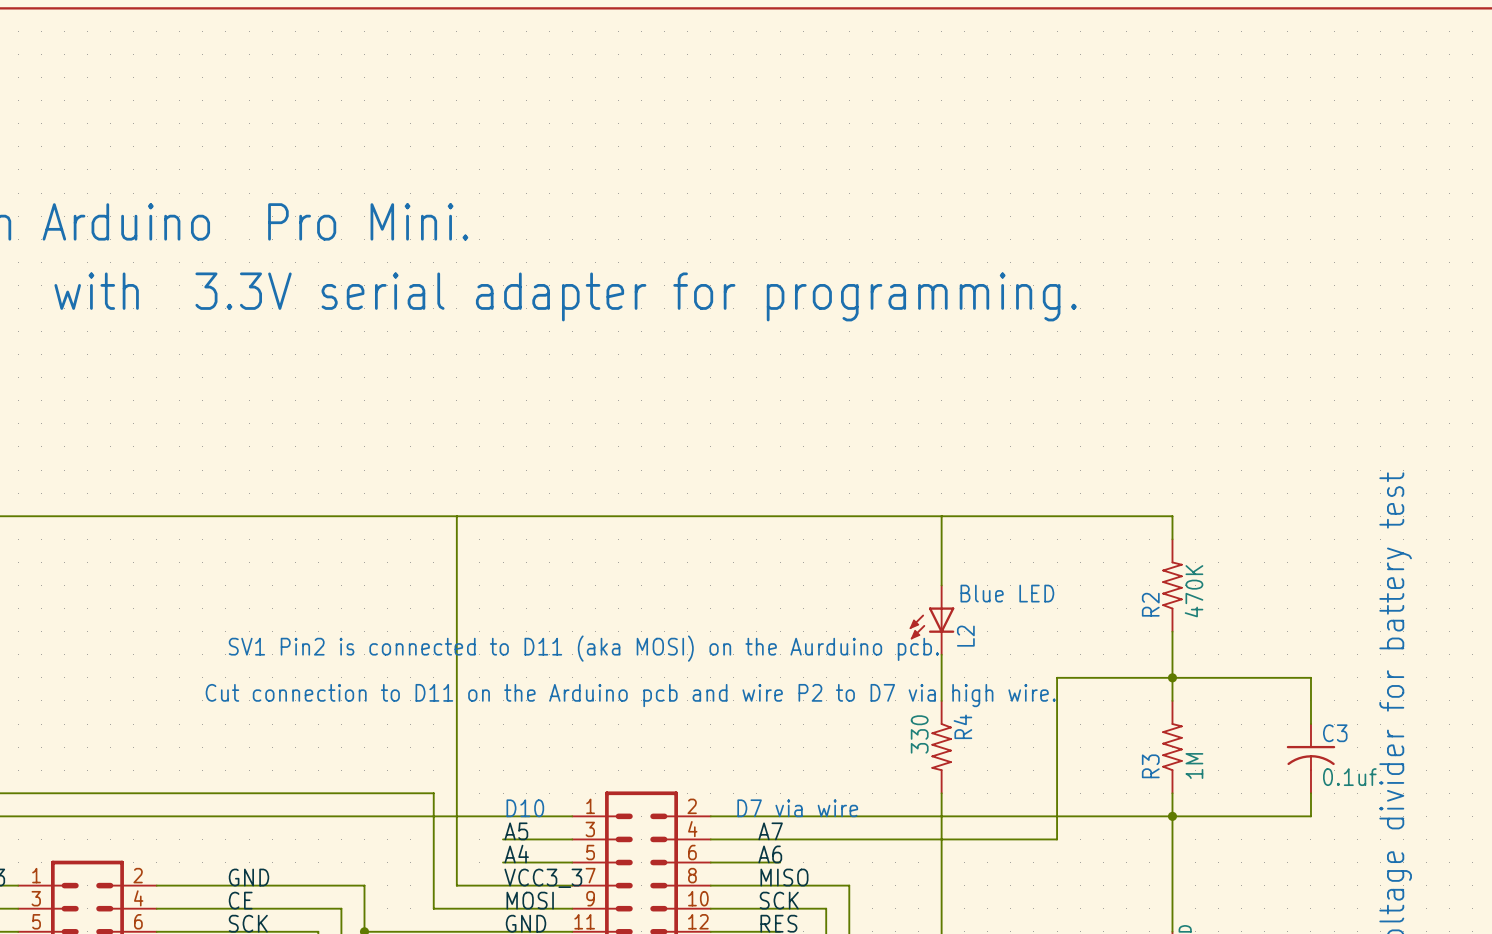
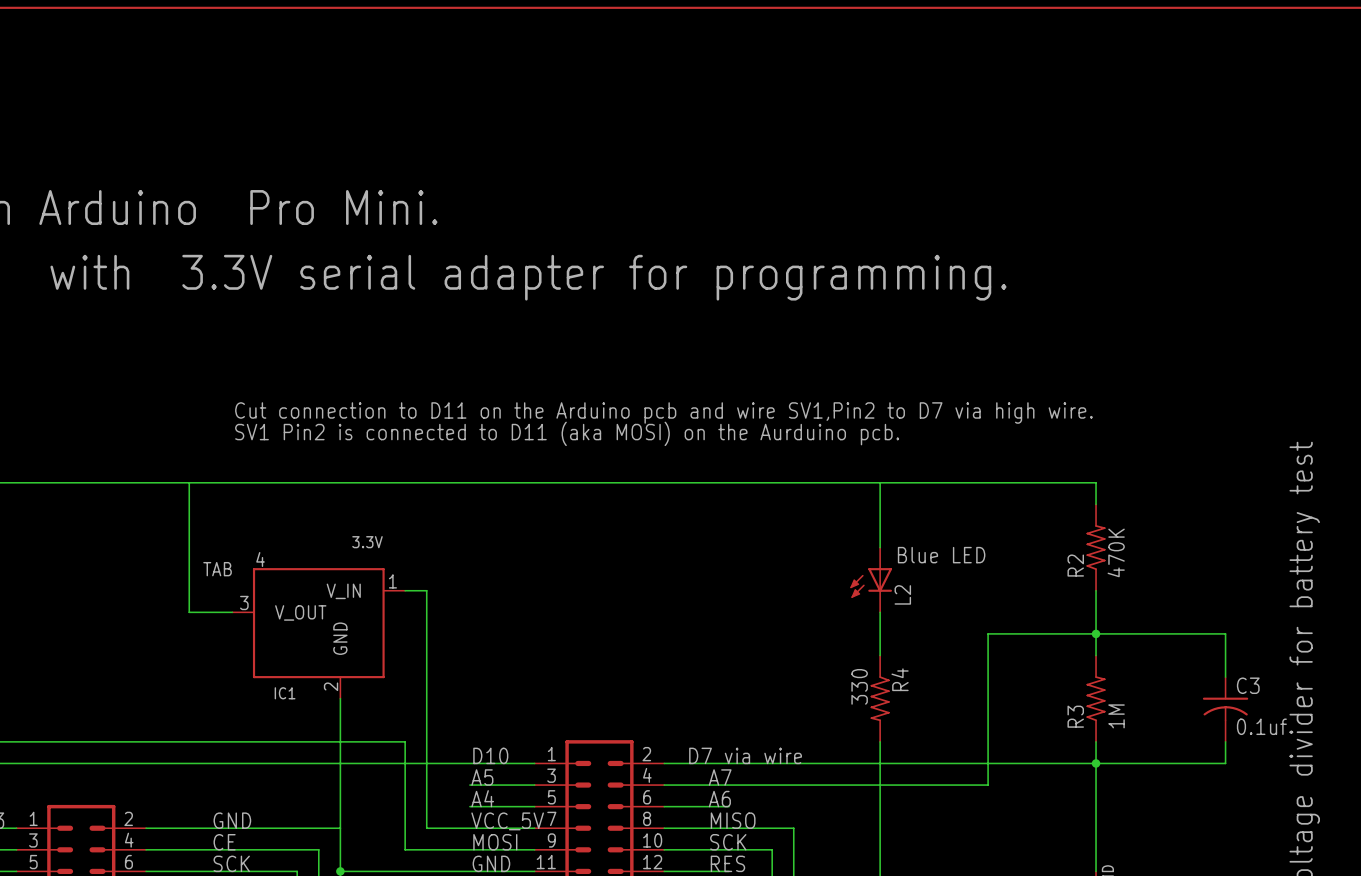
text: none -> Cut connection to D11 on the Arduino pcb and wire SV1,Pin2 to D7 via high wire. (663, 412)
wire: none -> (189, 482) (189, 612) (232, 612)
wire: (456, 516) (456, 631) -> (405, 590) (426, 590)
text position: SV1 Pin2 is connected to D11 (aka MOSI) on the Aurduino pcb. (583, 648) -> SV1 Pin2 is connected to D11 (aka MOSI) on the Aurduino pcb. (567, 433)
IC1: none -> 3.3V (318, 633)
text: Cut connection to D11 on the Arduino pcb and wire P2 to D7 via high wire. (630, 695) -> none
wire: none -> (340, 698) (340, 828)
label: VCC3_3 (543, 878) -> VCC_5V (507, 821)

